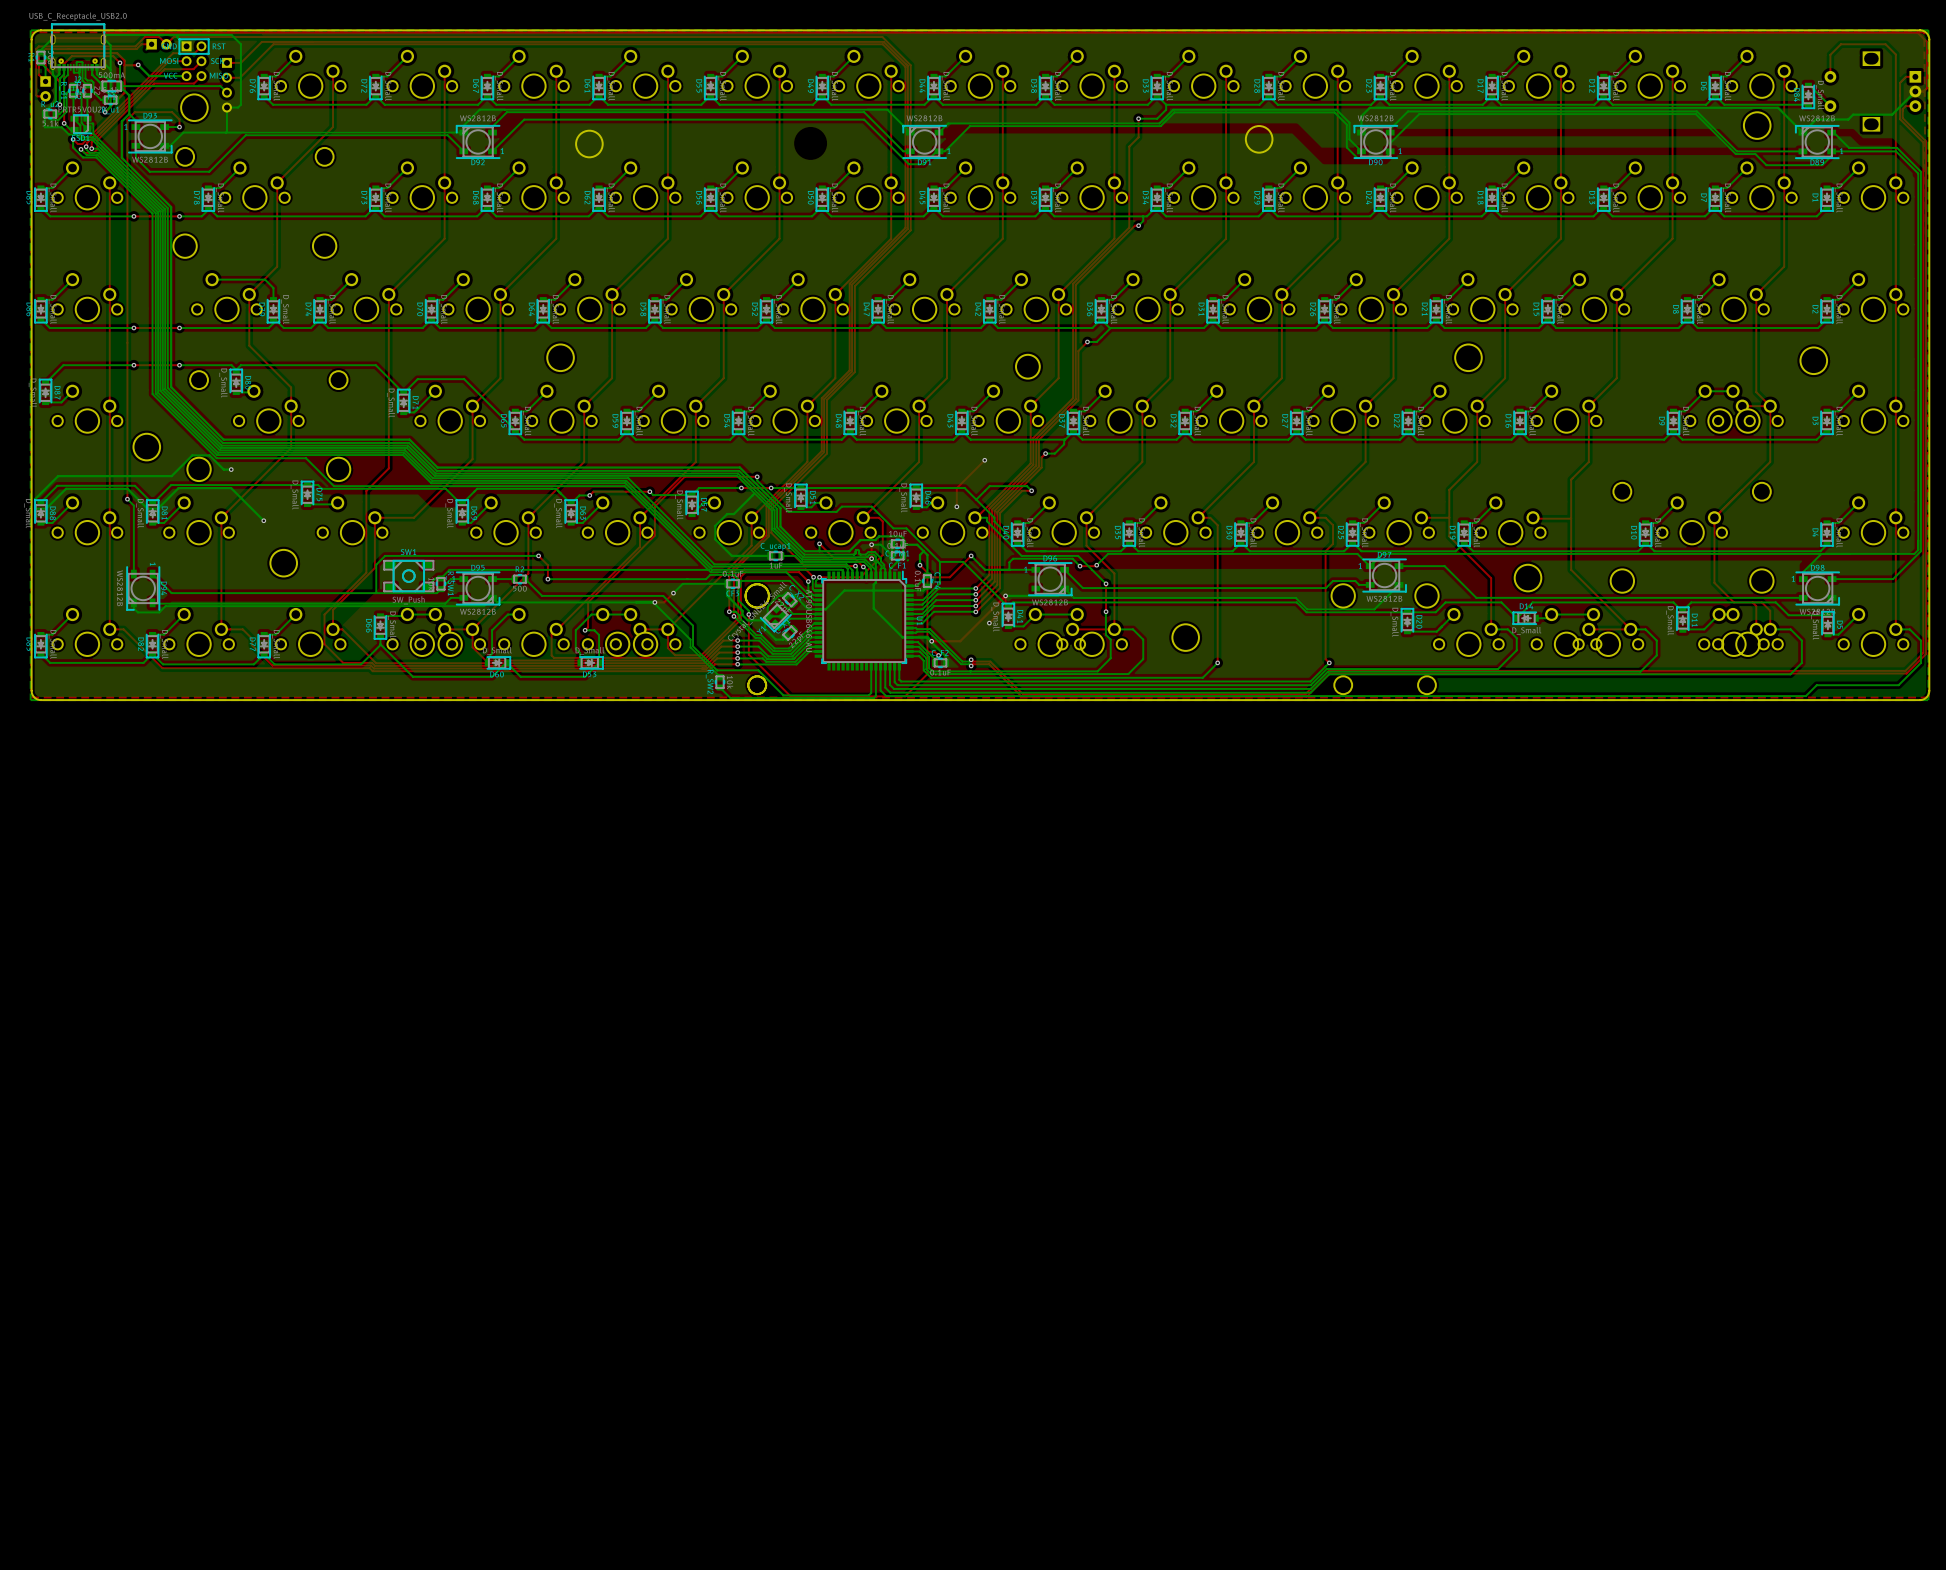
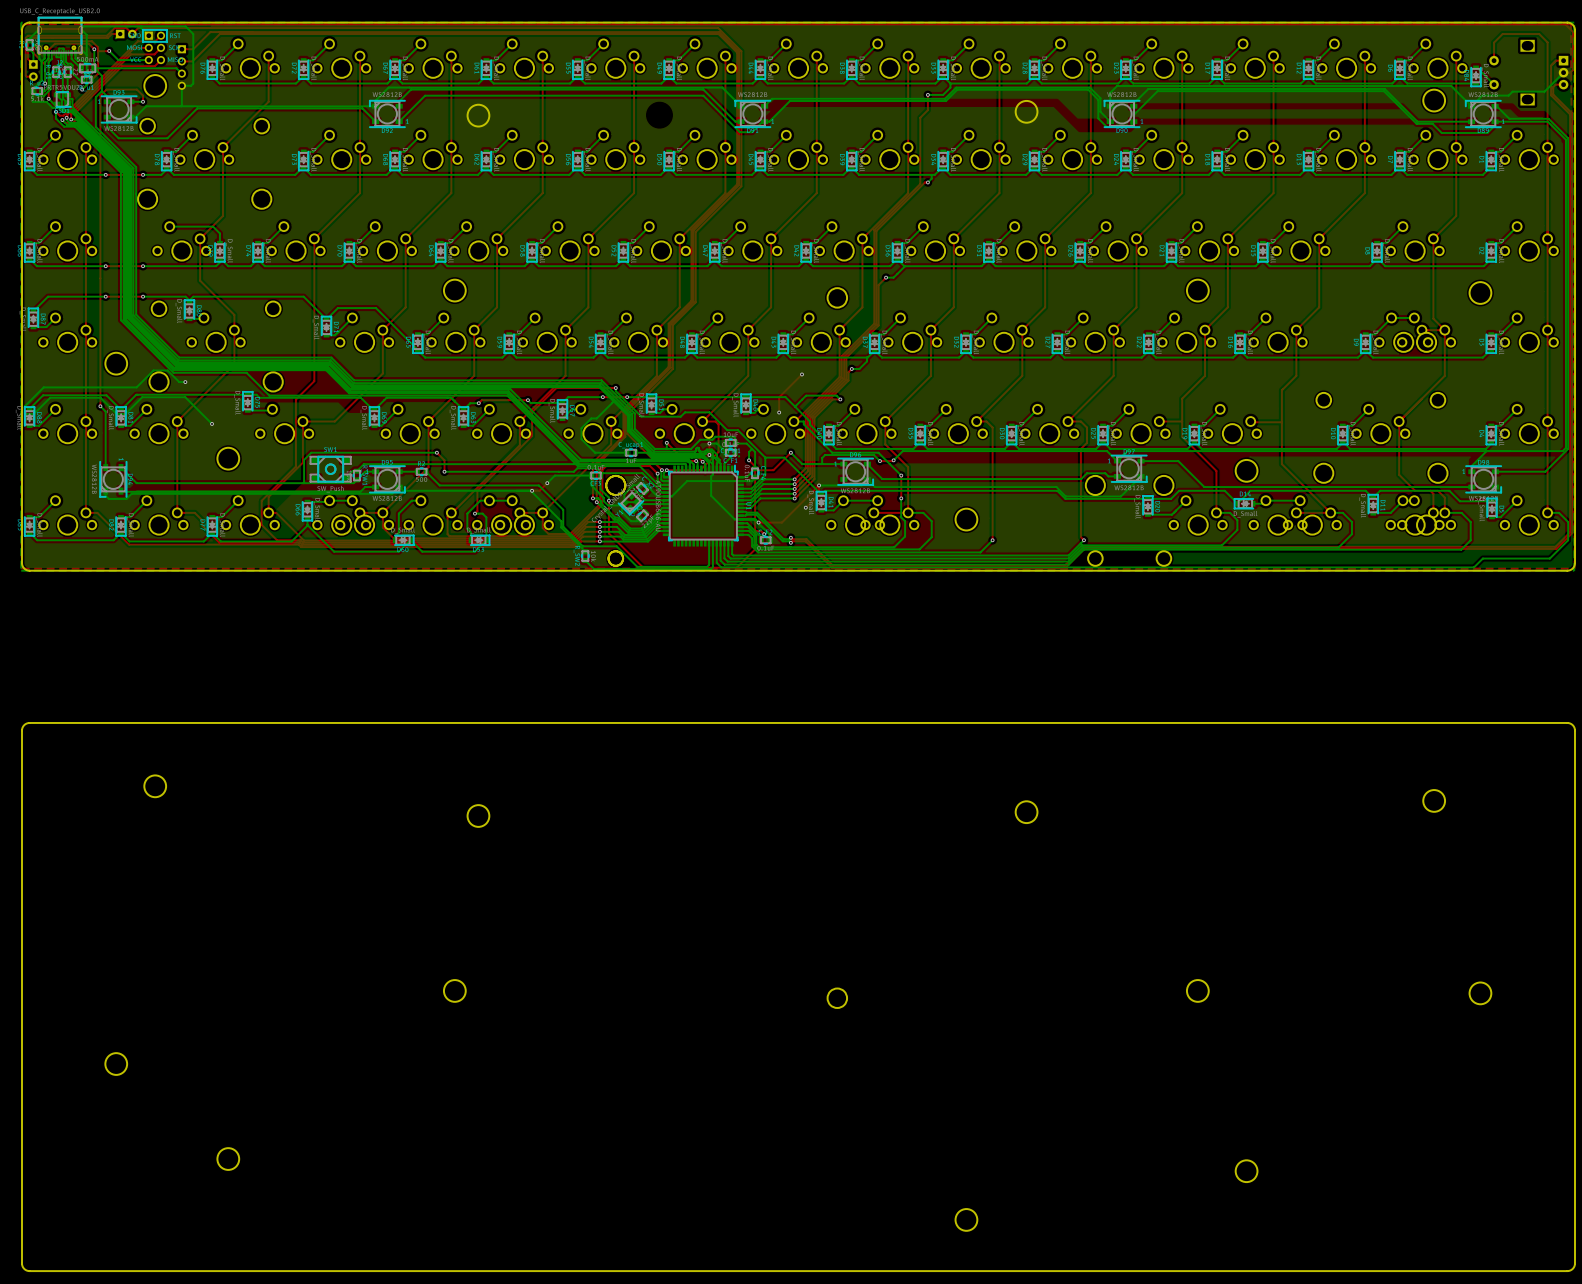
board edge: none -> (1567, 722) (26, 723) (22, 730) (22, 1266) (29, 1271) (1570, 1270) (1574, 1263) (1574, 730) (1572, 725) (1567, 722)
round board edge: none -> [144, 775, 167, 798]
round board edge: none -> [1423, 789, 1446, 812]
round board edge: none -> [1015, 801, 1038, 824]
round board edge: none -> [467, 804, 490, 828]
round board edge: none -> [443, 979, 466, 1002]
round board edge: none -> [1186, 979, 1209, 1002]
round board edge: none -> [1469, 982, 1492, 1005]
round board edge: none -> [827, 988, 848, 1009]
round board edge: none -> [105, 1053, 128, 1076]
round board edge: none -> [217, 1148, 240, 1171]
round board edge: none -> [1235, 1160, 1258, 1183]
round board edge: none -> [955, 1208, 978, 1231]

